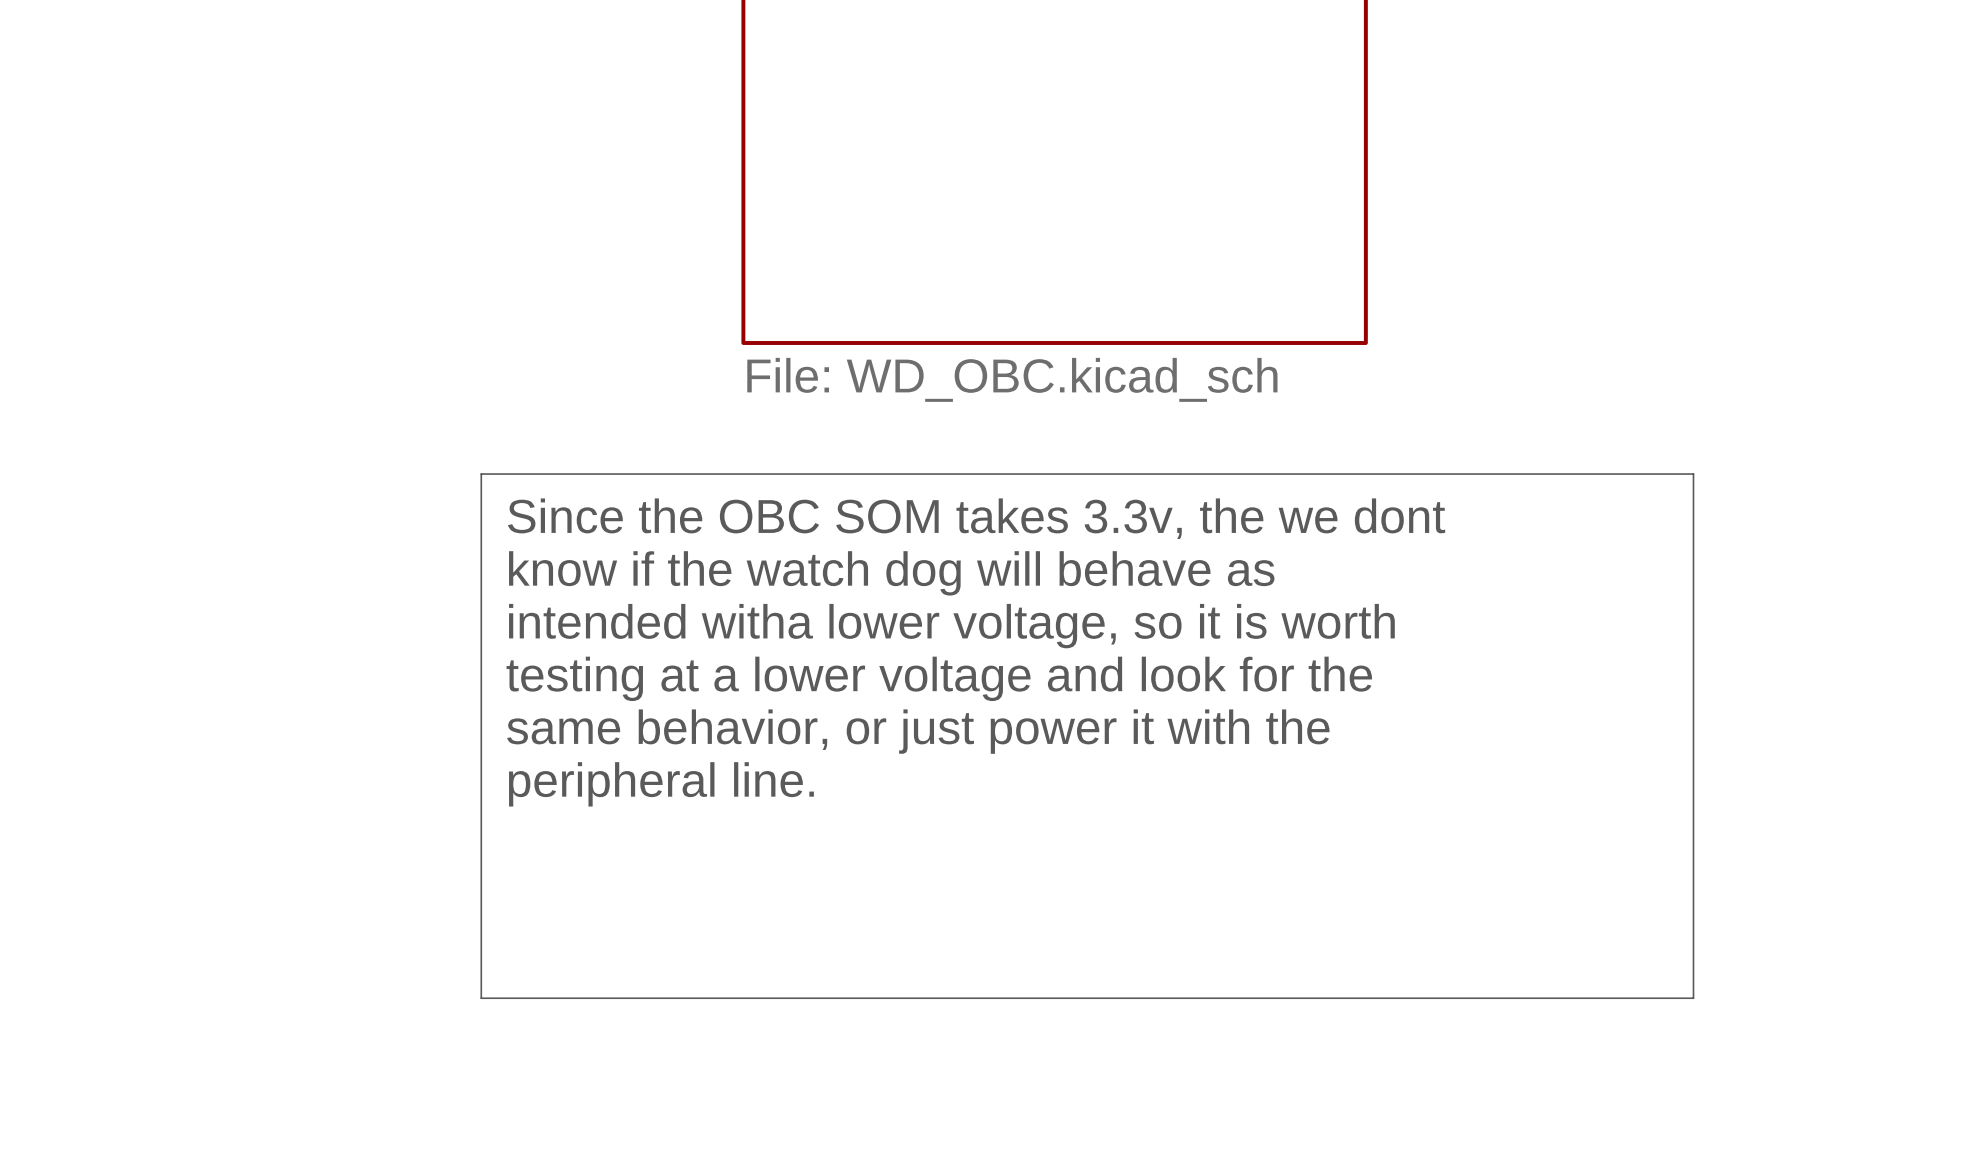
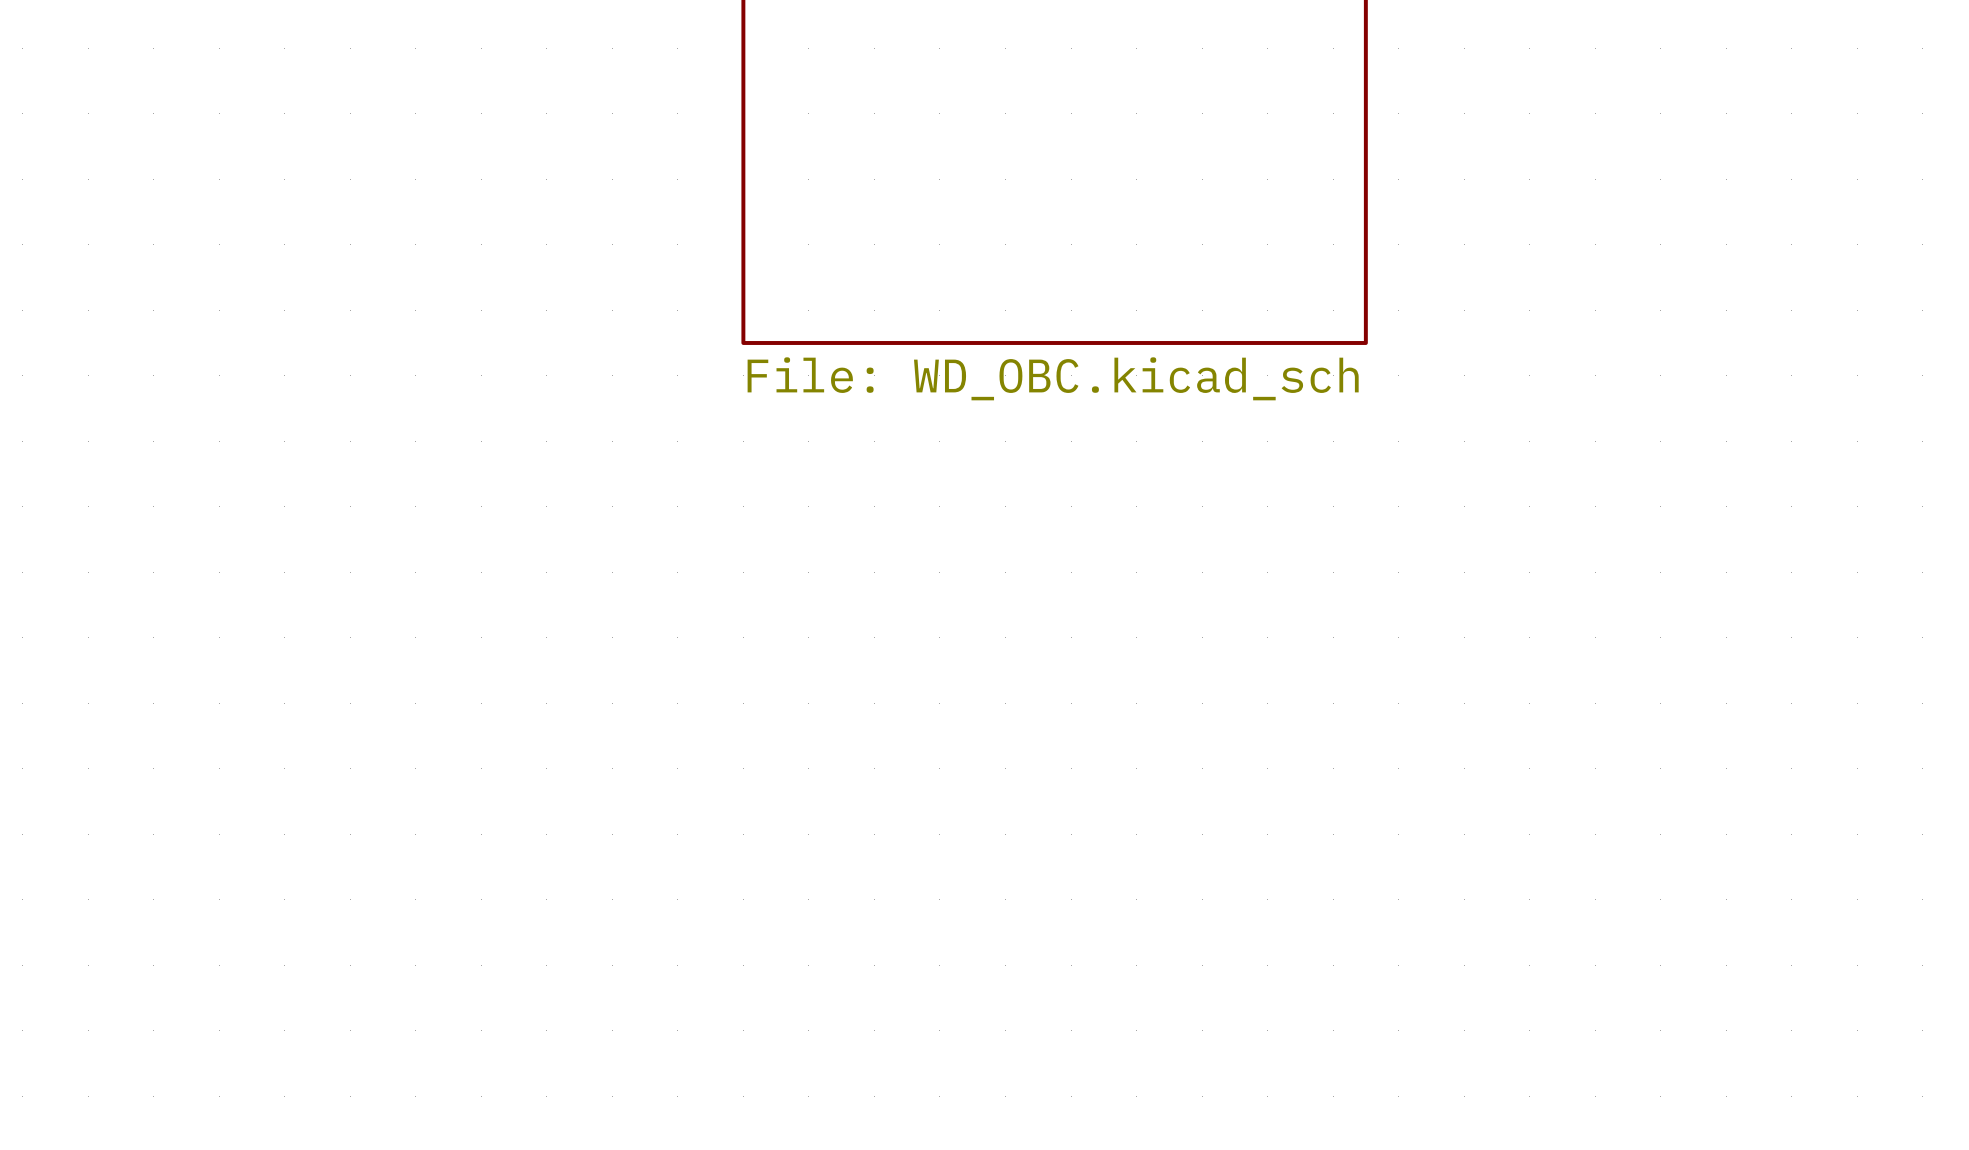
line: (481, 474) (1693, 474) (1693, 998) (481, 998) (481, 474) -> none
text: Since the OBC SOM takes 3.3v, the we dont (976, 518) -> none
text: know if the watch dog will behave as (891, 573) -> none
text: intended witha lower voltage, so it is worth (951, 626) -> none
text: testing at a lower voltage and look for the (939, 678) -> none
text: same behavior, or just power it with the (918, 731) -> none
text: peripheral line. (661, 784) -> none

